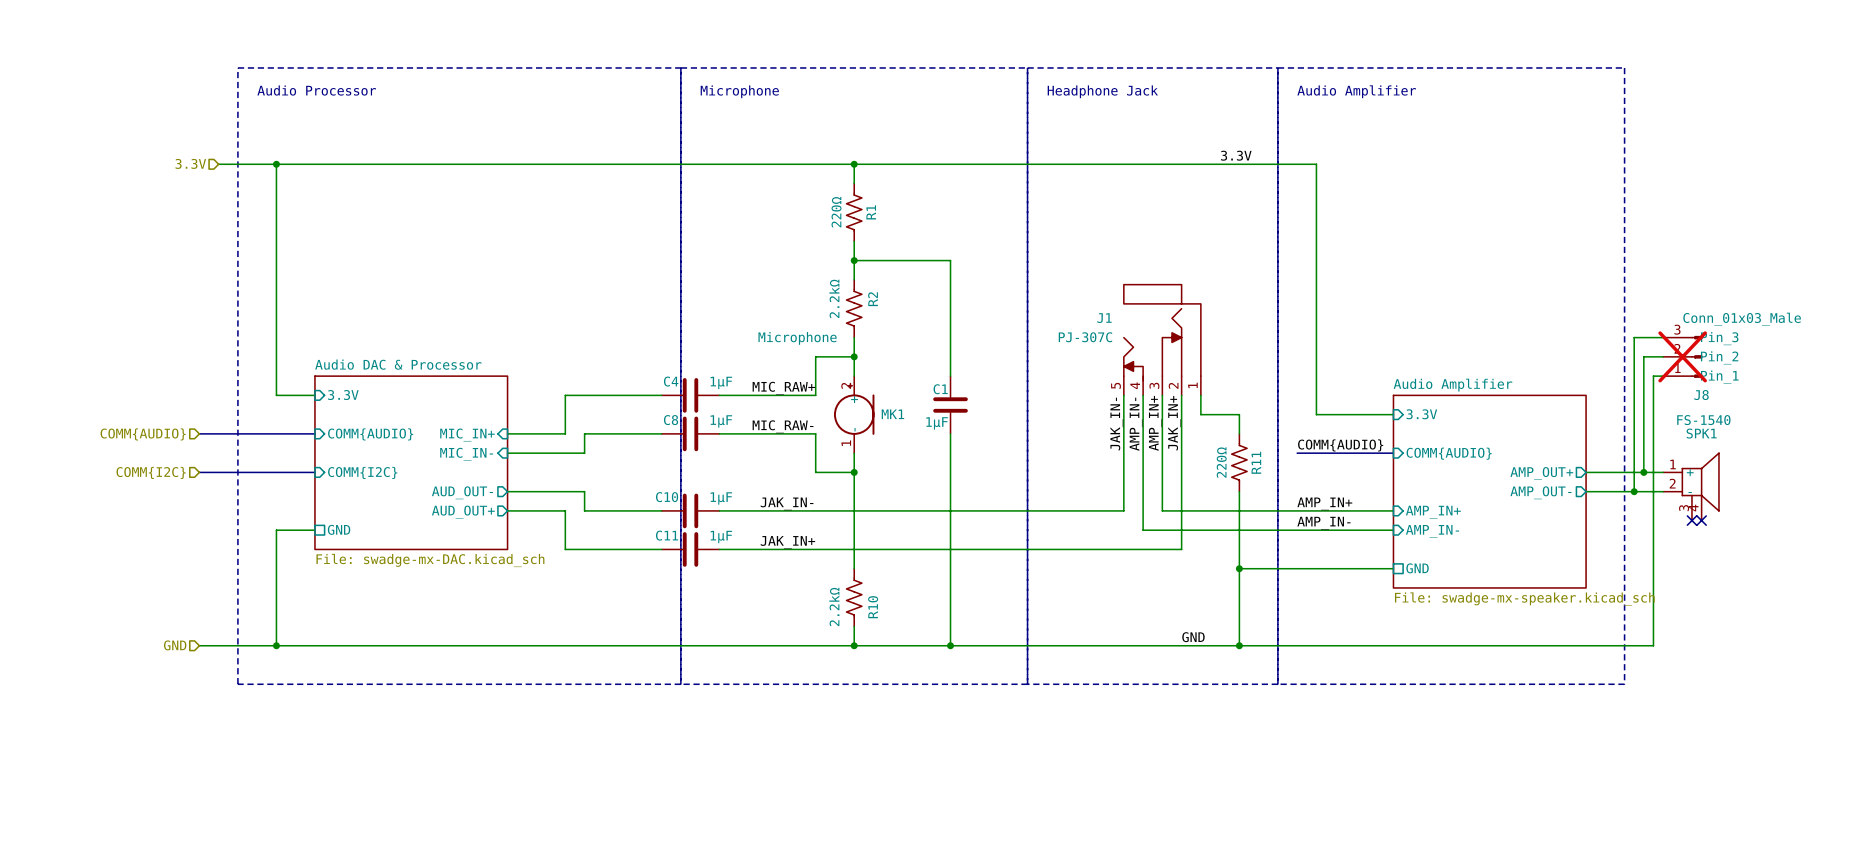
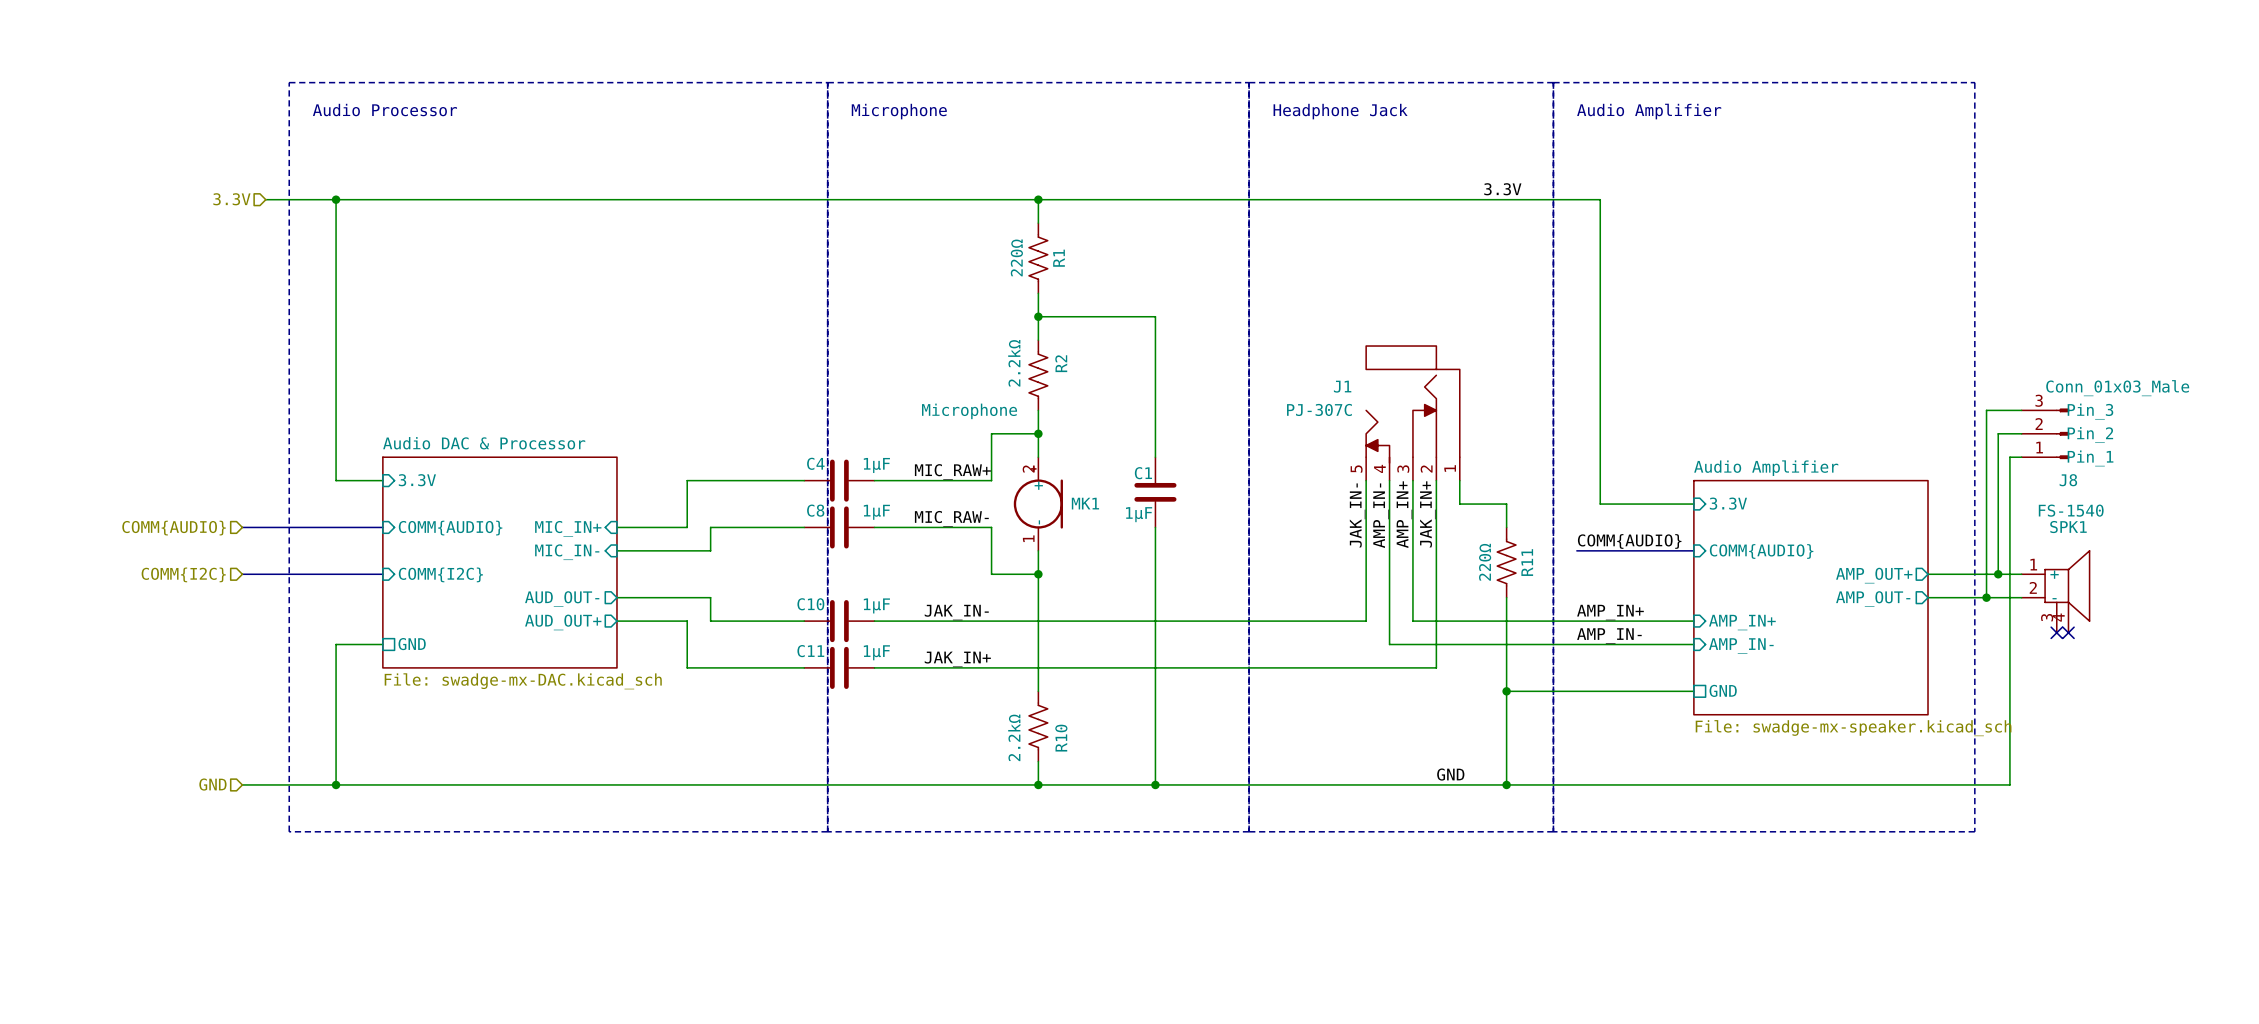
J8 do-not-place cross: (1682, 356) -> none

